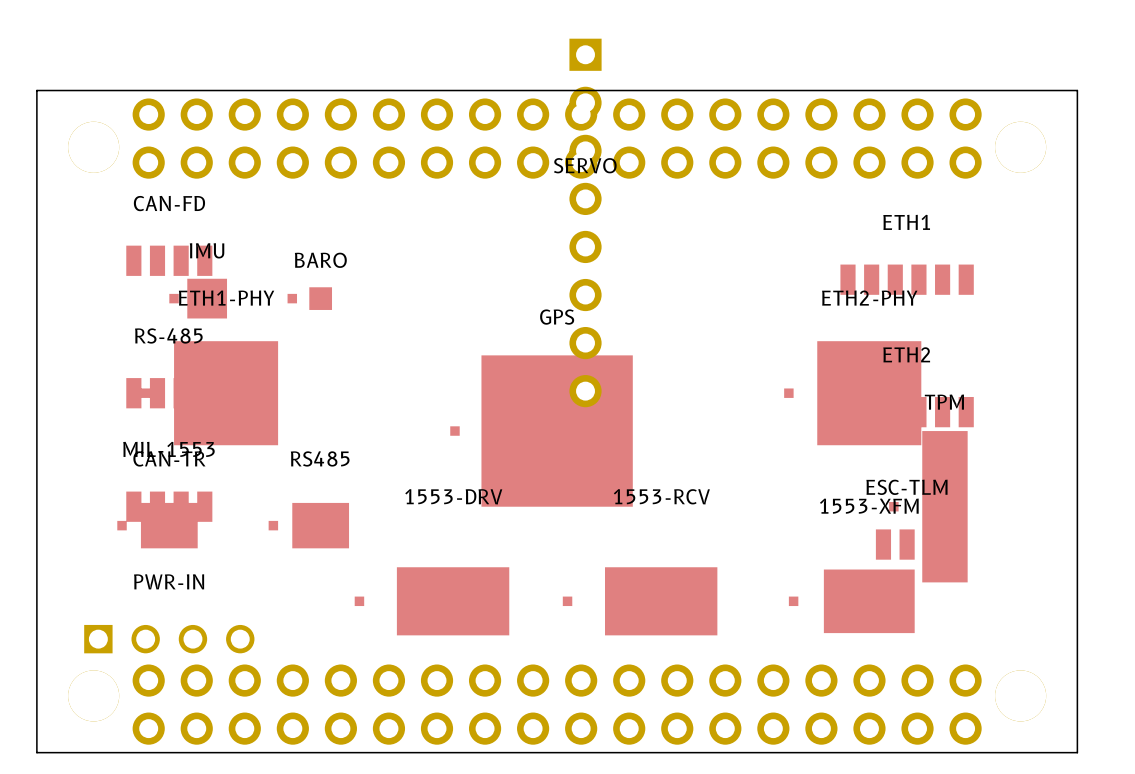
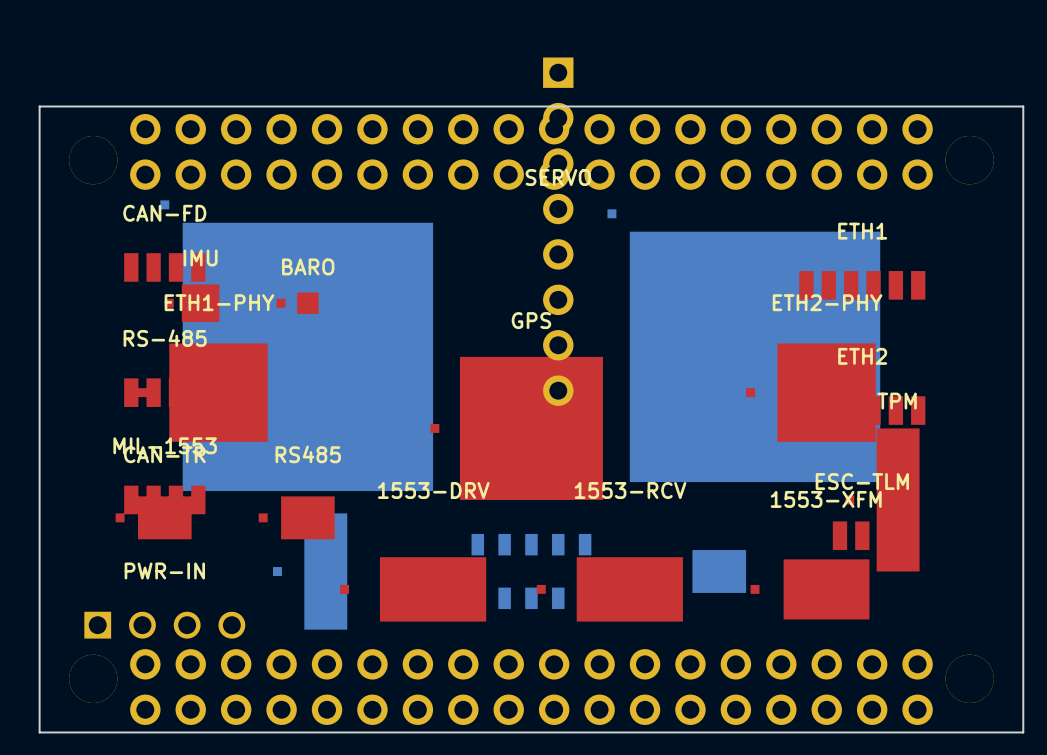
part: none -> (296, 345)
part: none -> (743, 345)
part: none -> (310, 571)
part: none -> (531, 571)
part: none -> (708, 571)

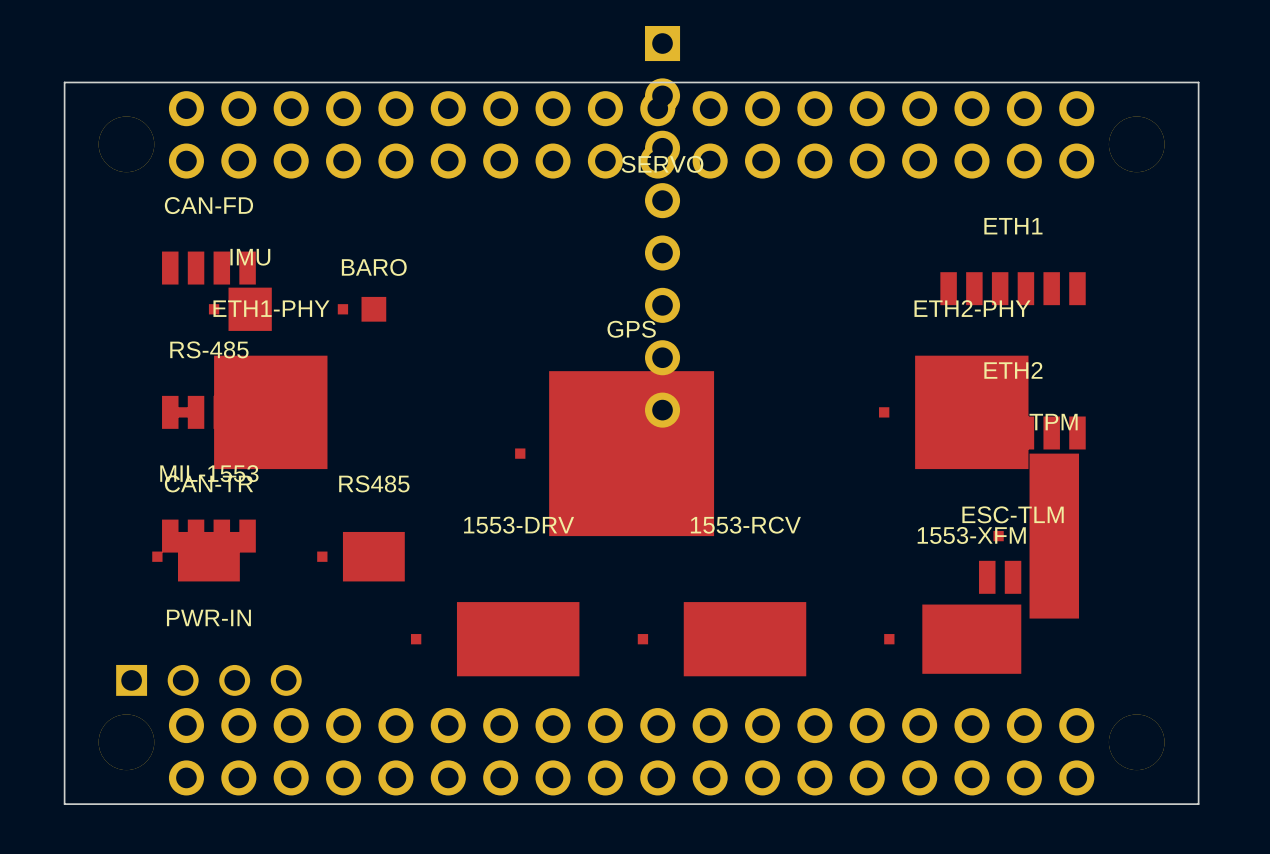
part: (296, 345) -> none
part: (743, 345) -> none
part: (310, 571) -> none
part: (531, 571) -> none
part: (708, 571) -> none

